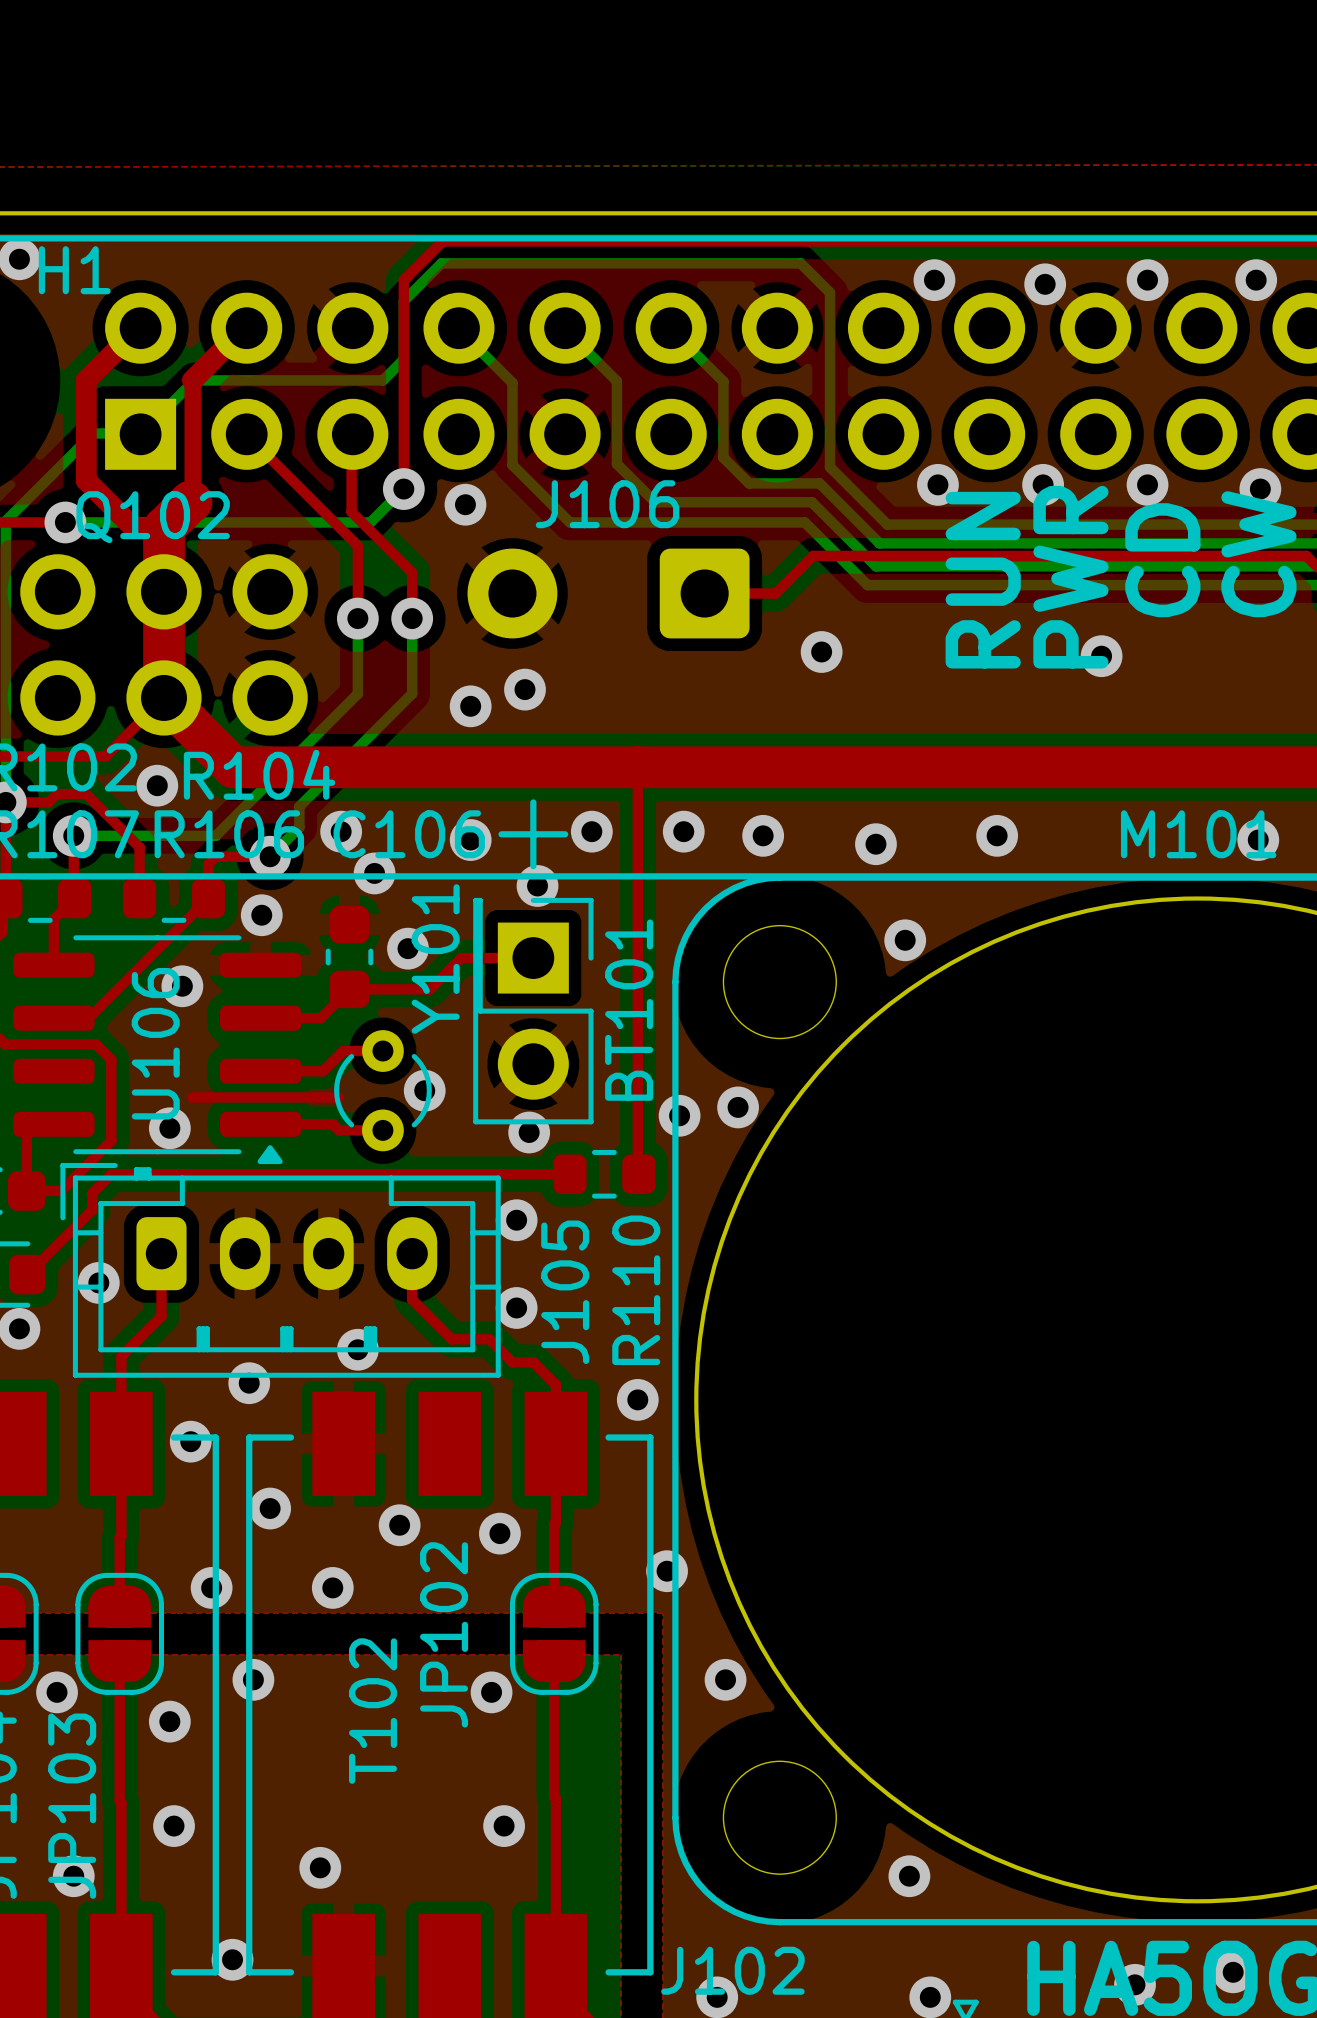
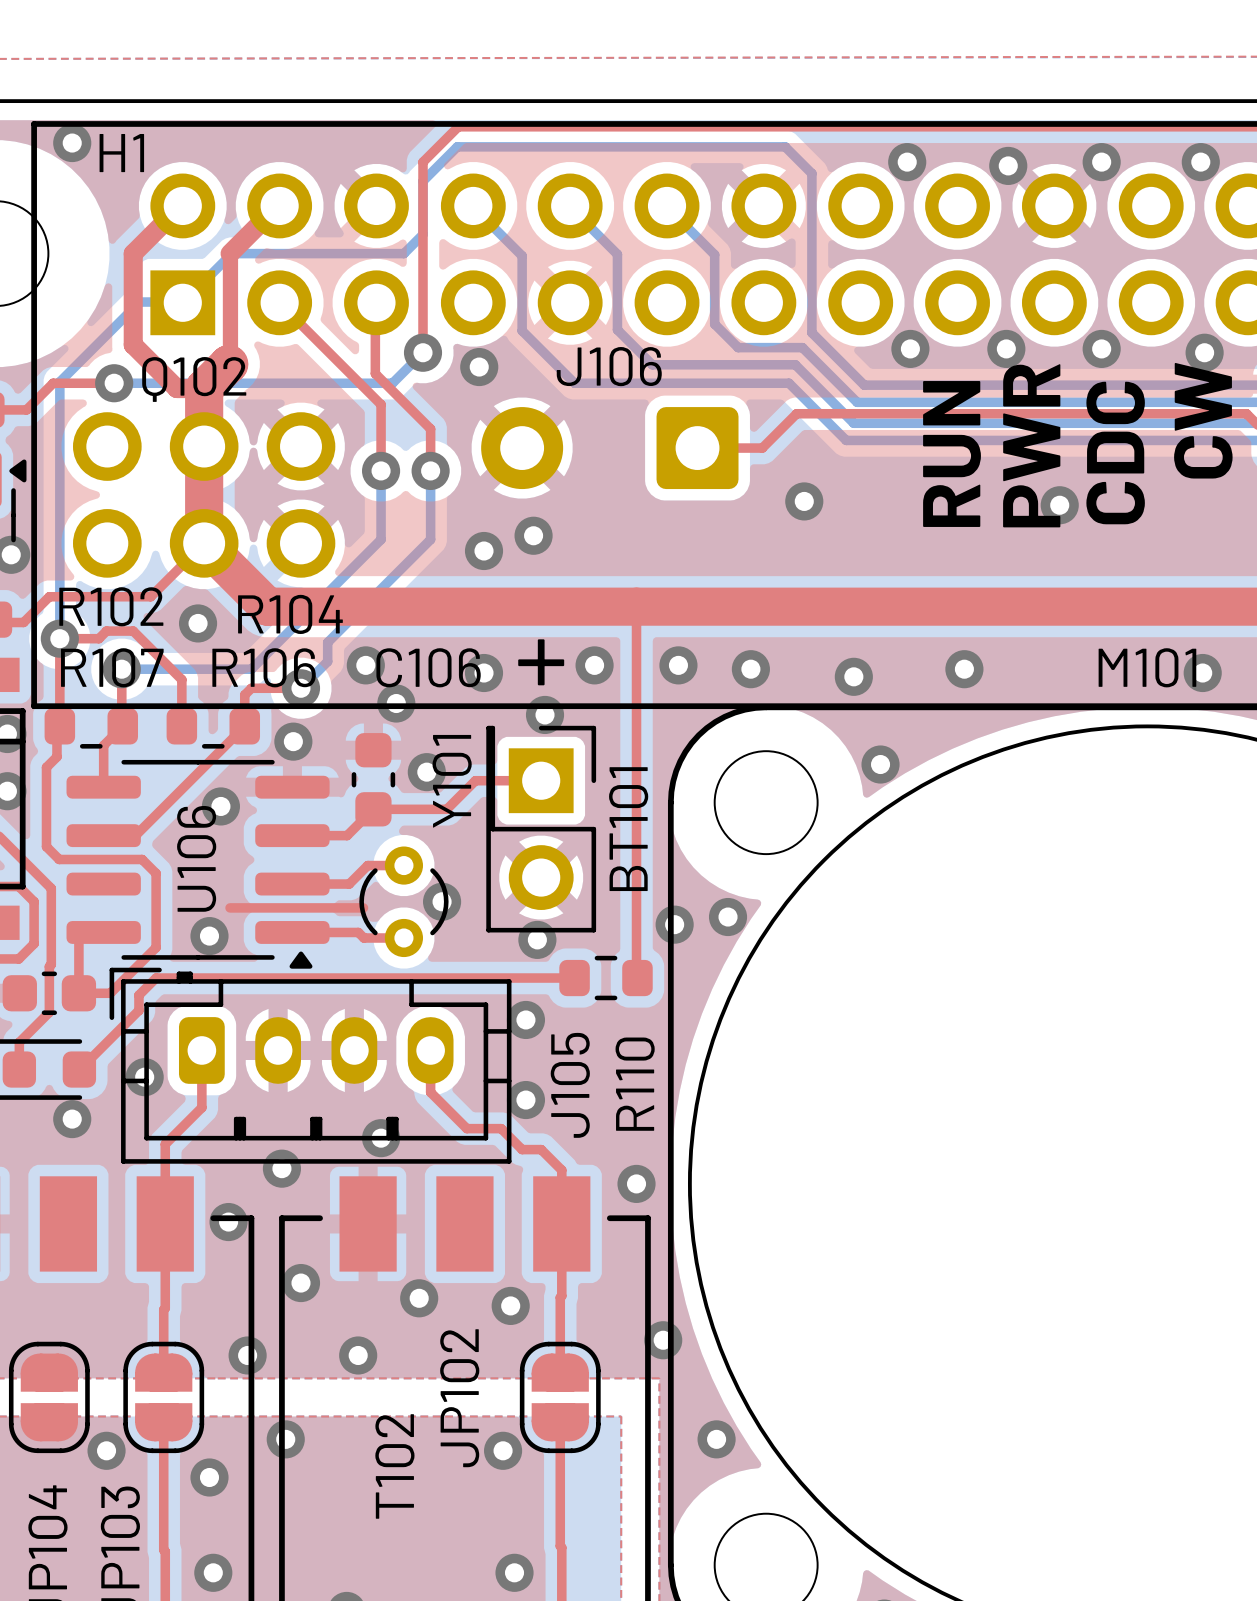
text: CD (1162, 560) -> CDC (1115, 453)

